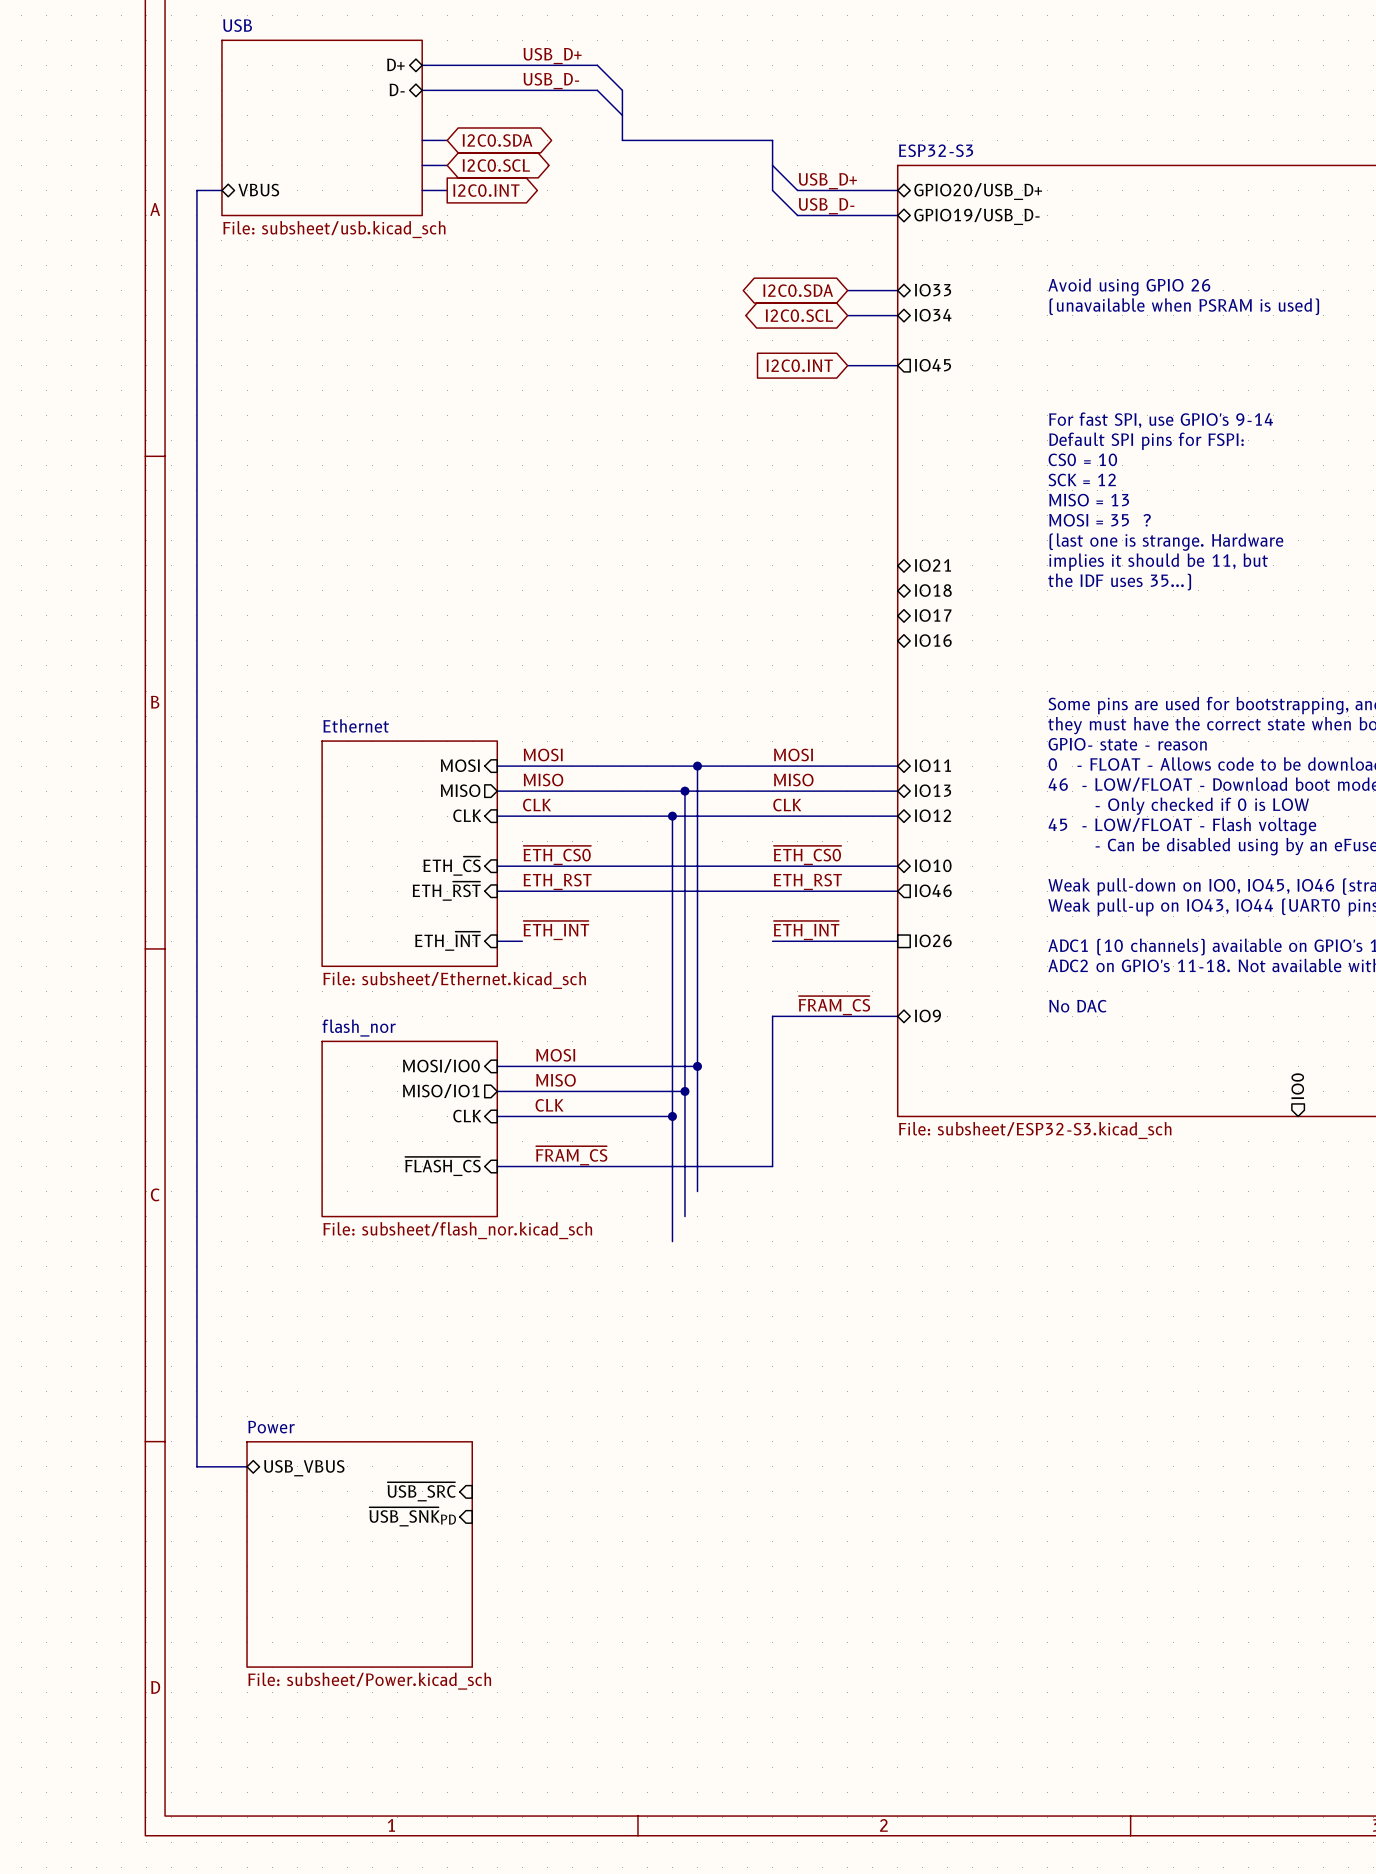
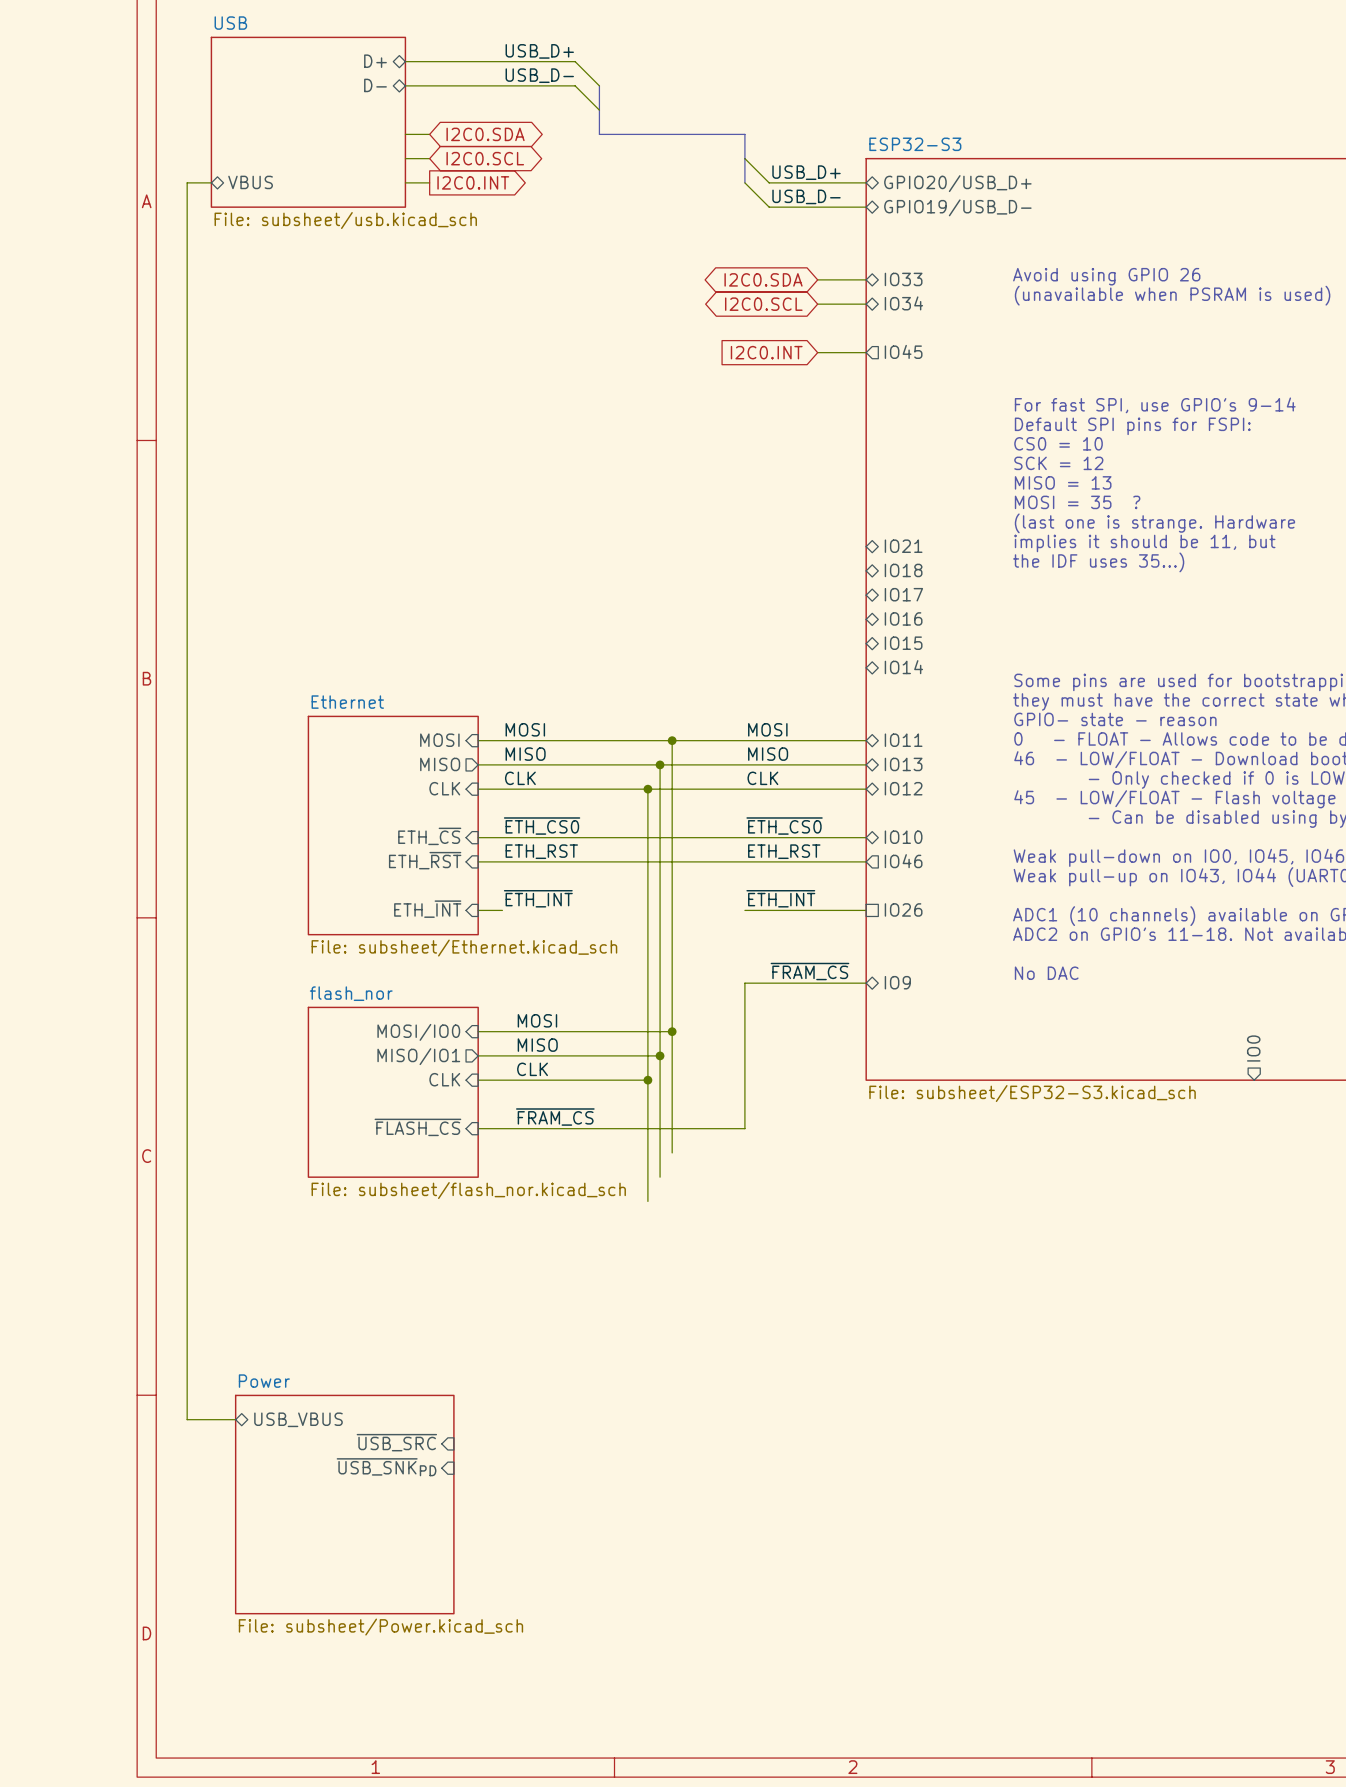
sheet pin: none -> IO15 (903, 643)
sheet pin: none -> IO14 (903, 667)

